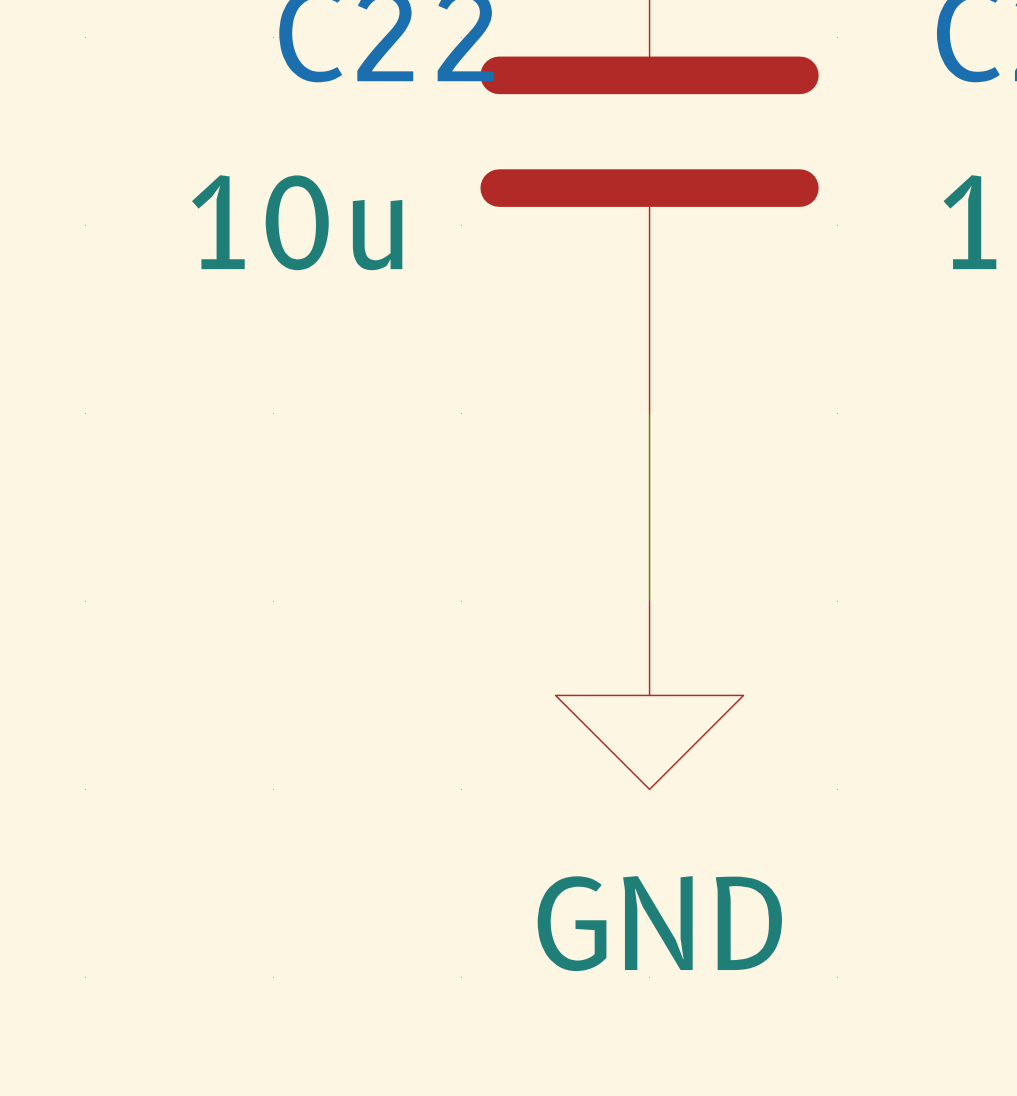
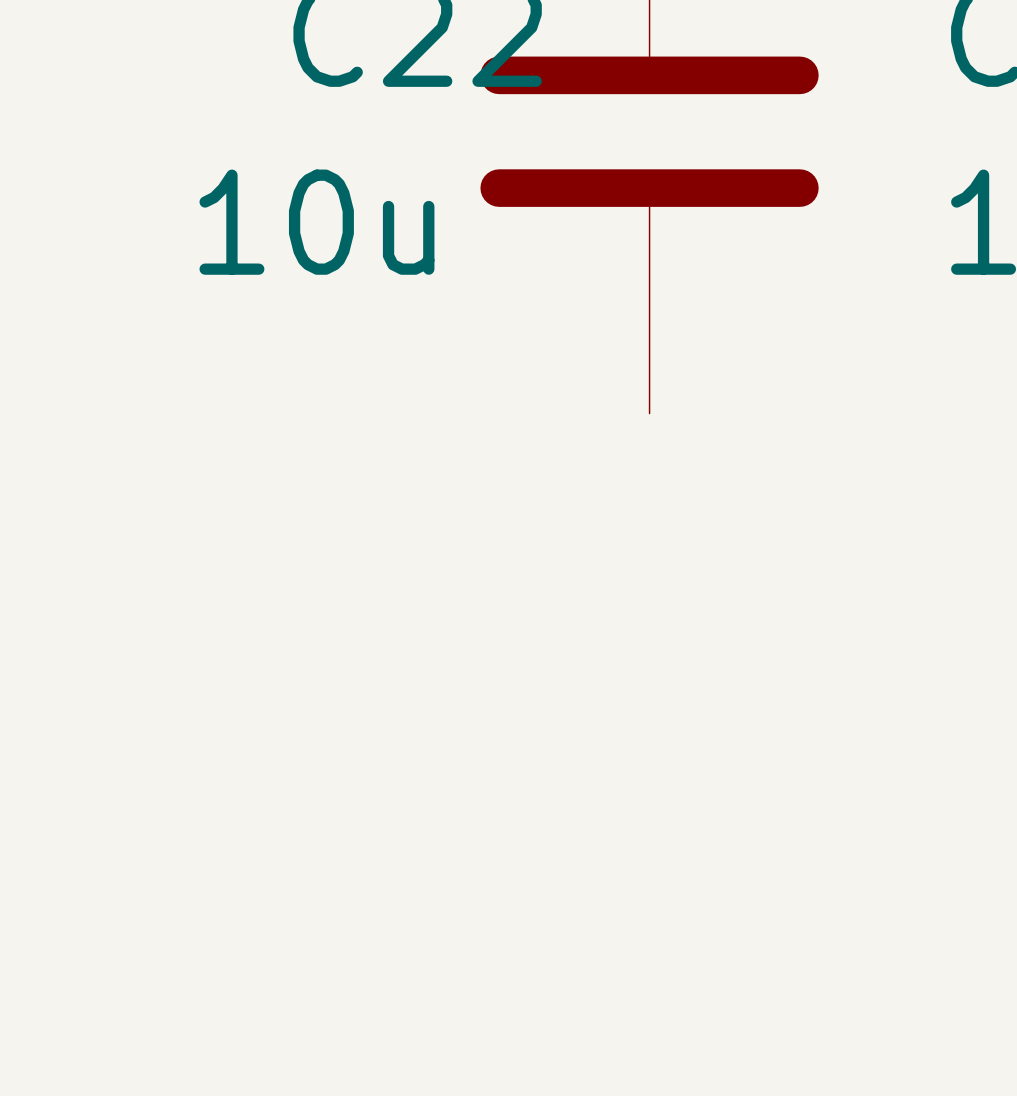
wire: (649, 413) (649, 601) -> none
power symbol: GND (649, 695) -> none

